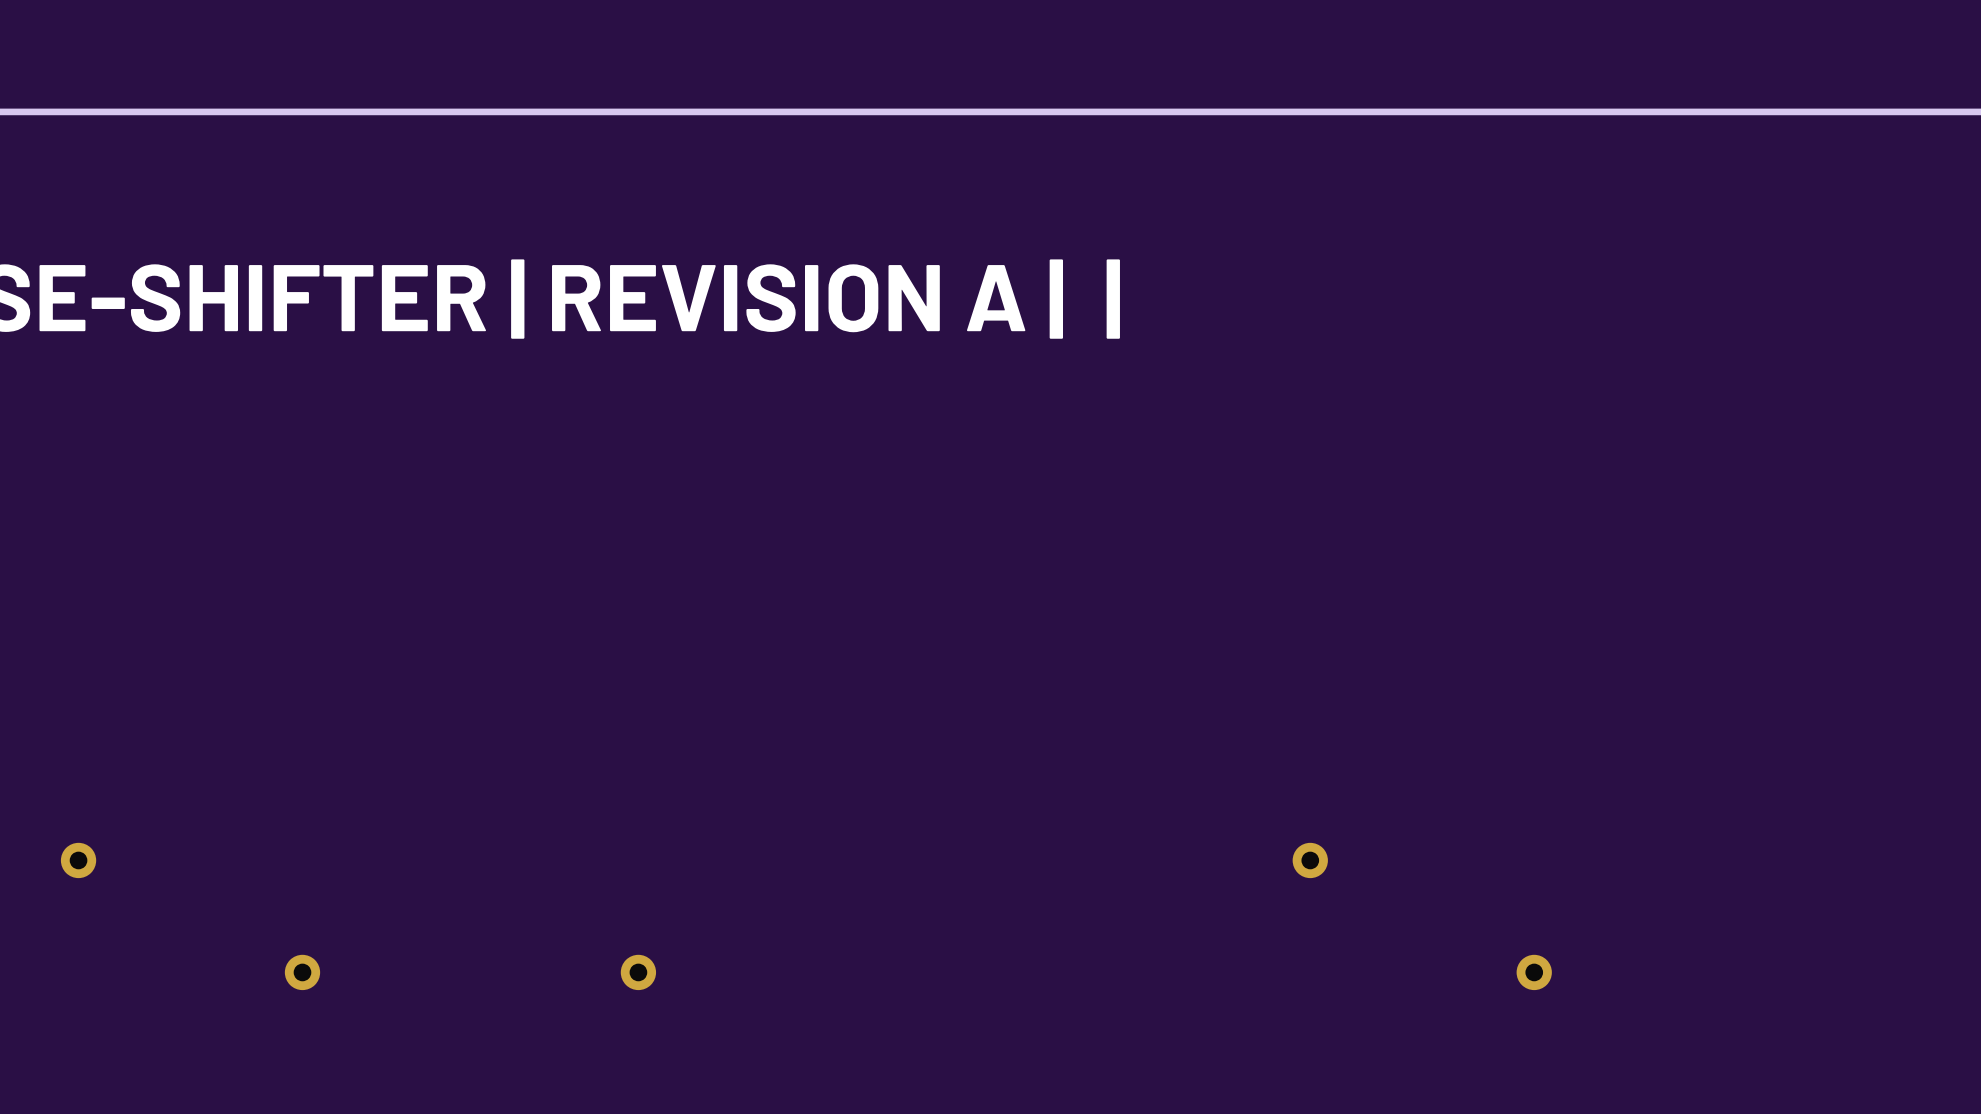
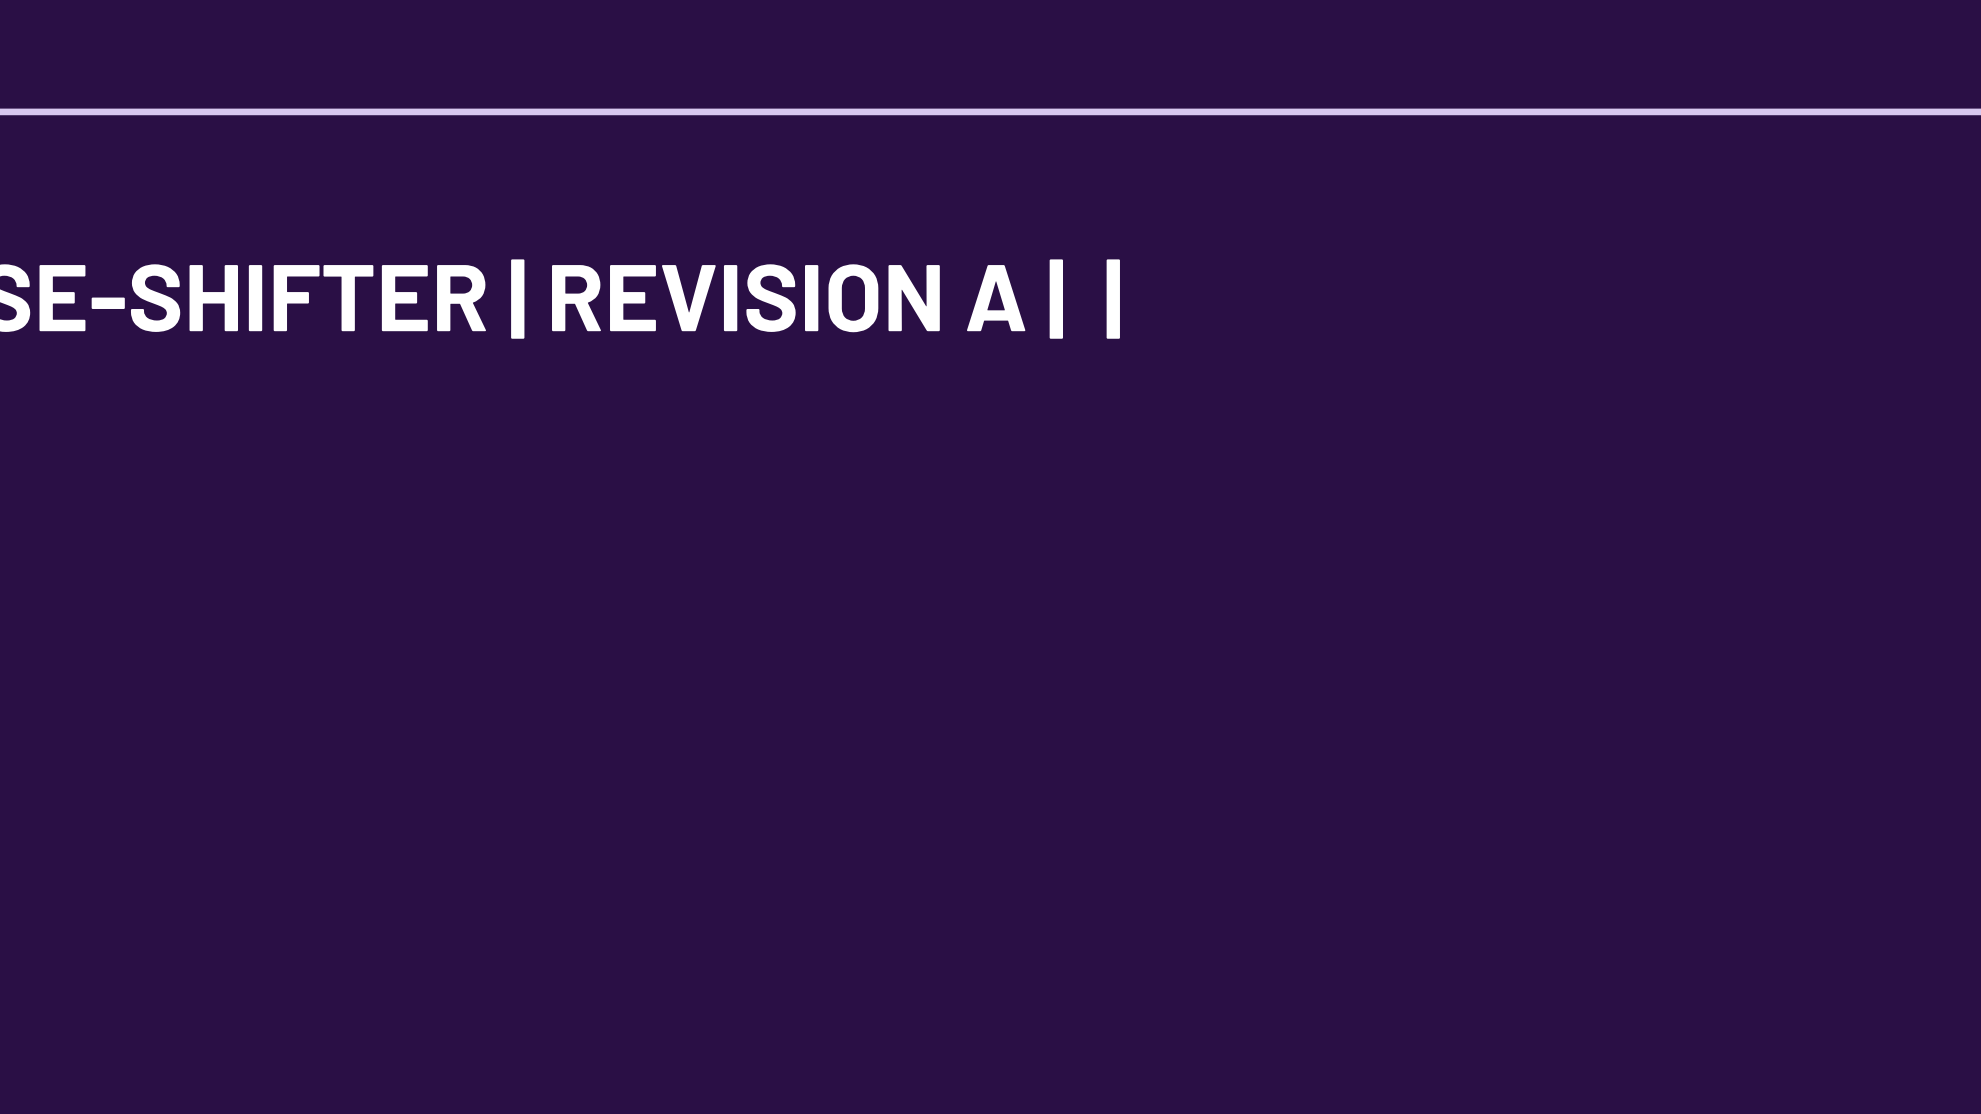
via: (78, 860) -> none
via: (1310, 860) -> none
via: (302, 972) -> none
via: (638, 972) -> none
via: (1534, 972) -> none

